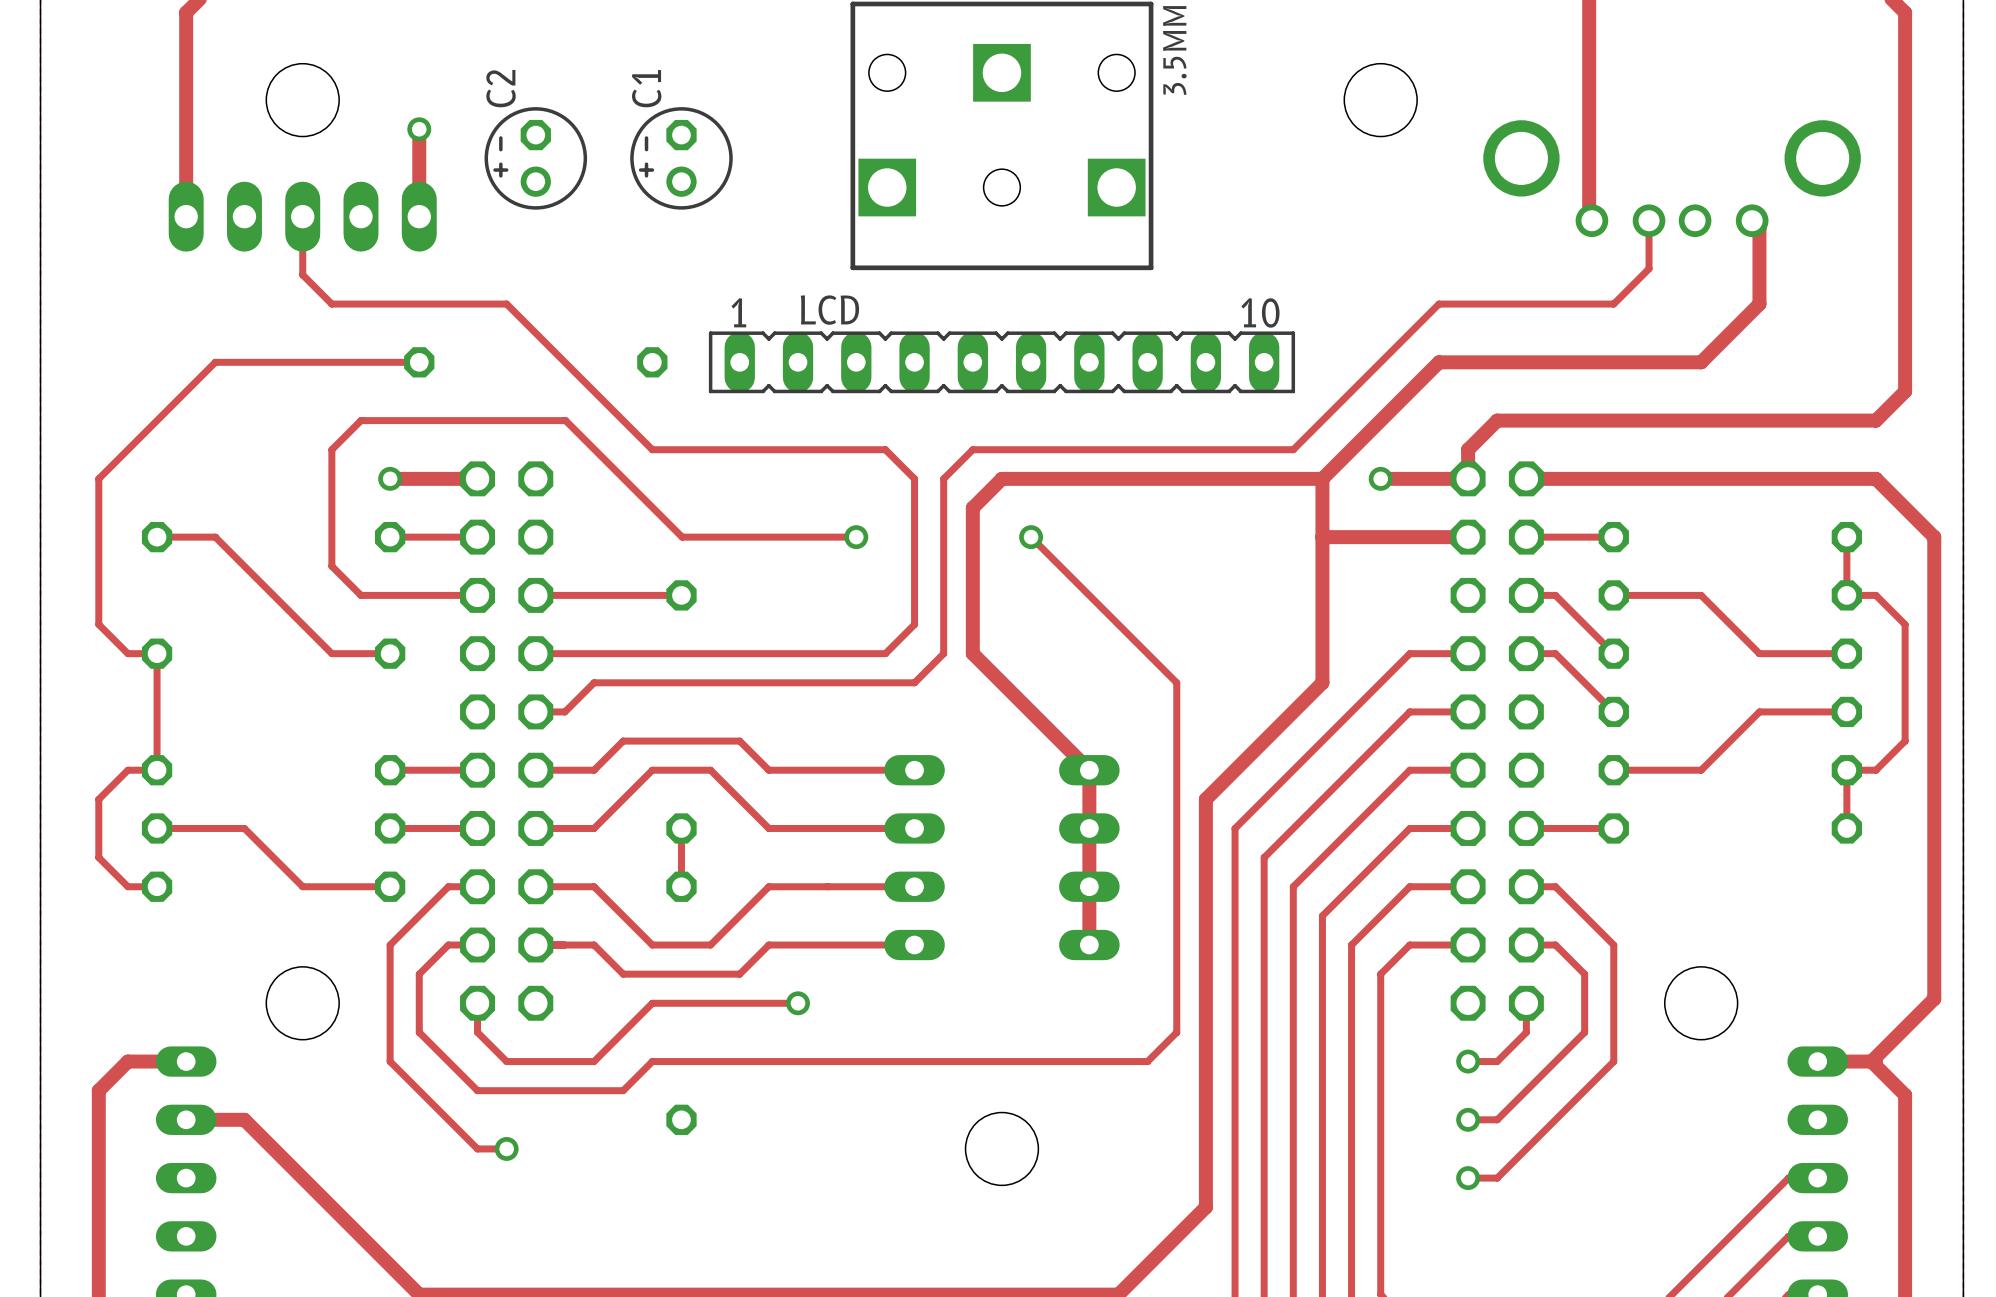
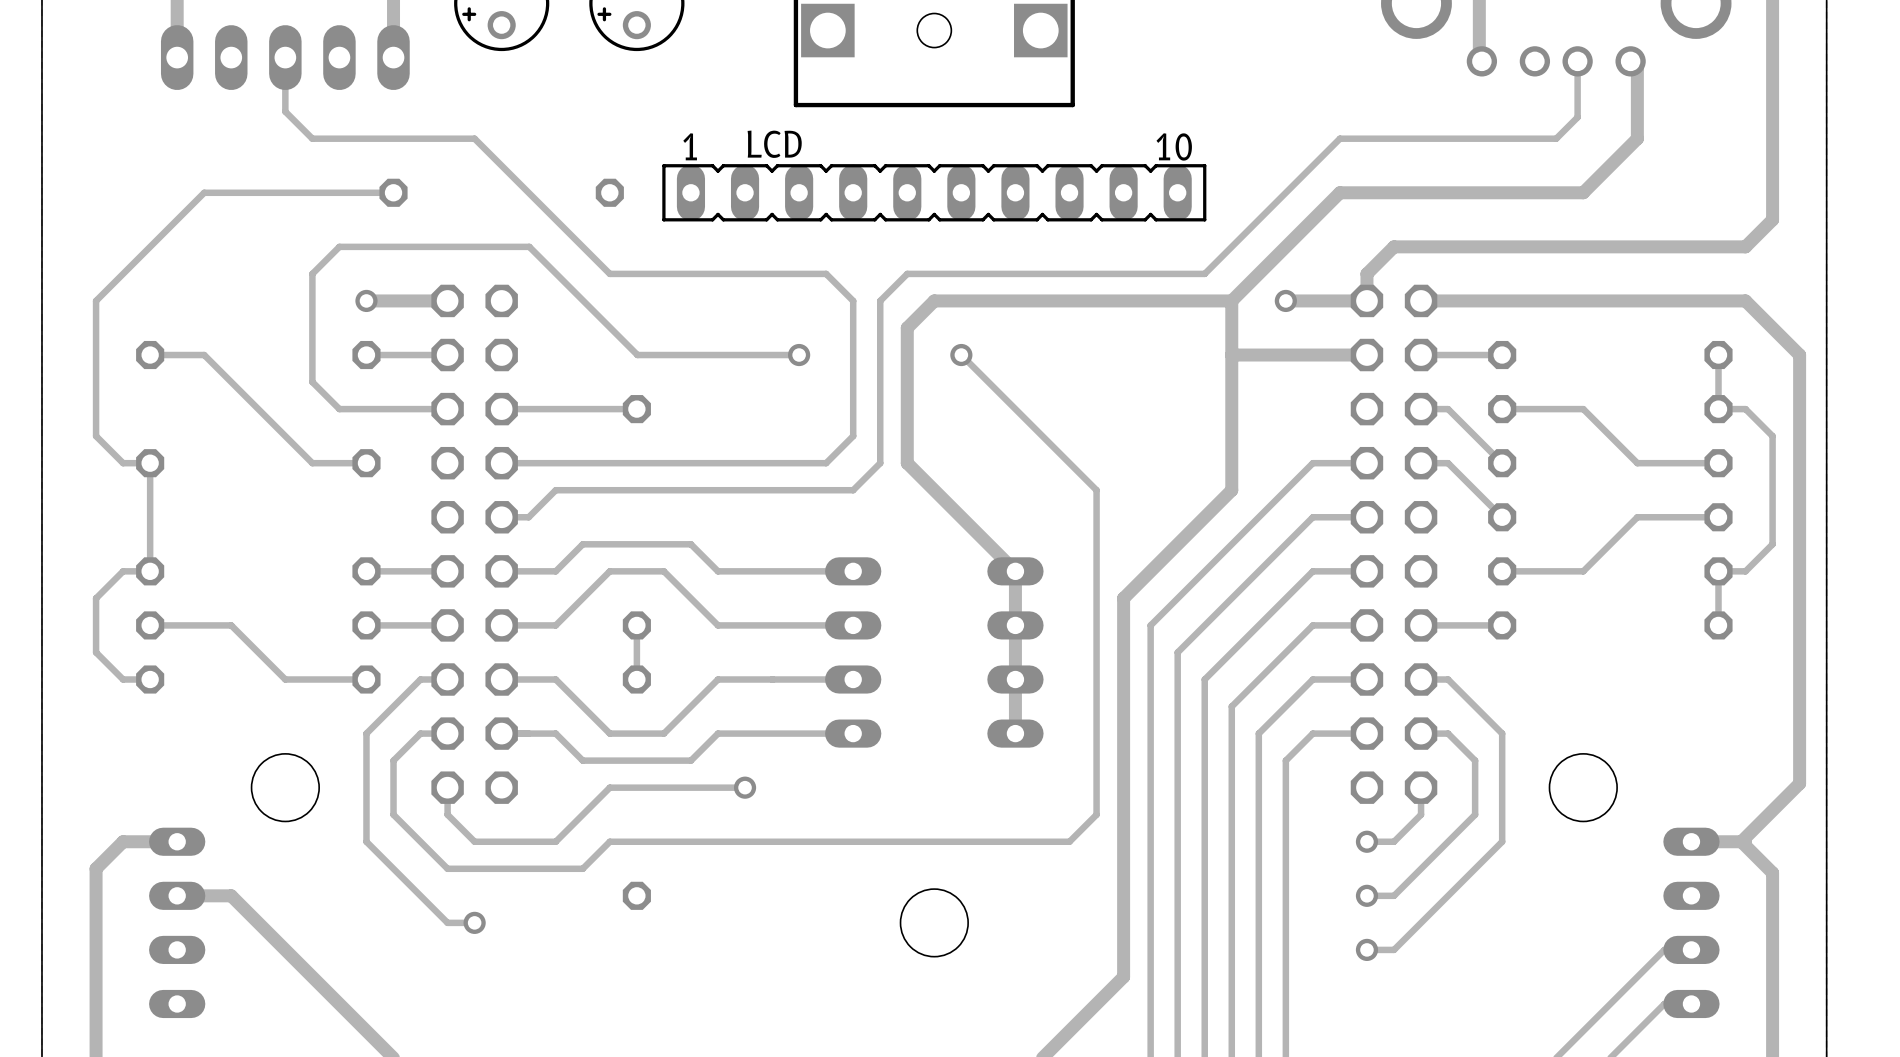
track: (1649, 220) (1649, 268) (1613, 304) -> (1577, 61) (1577, 117) (1556, 138) (1502, 138)

